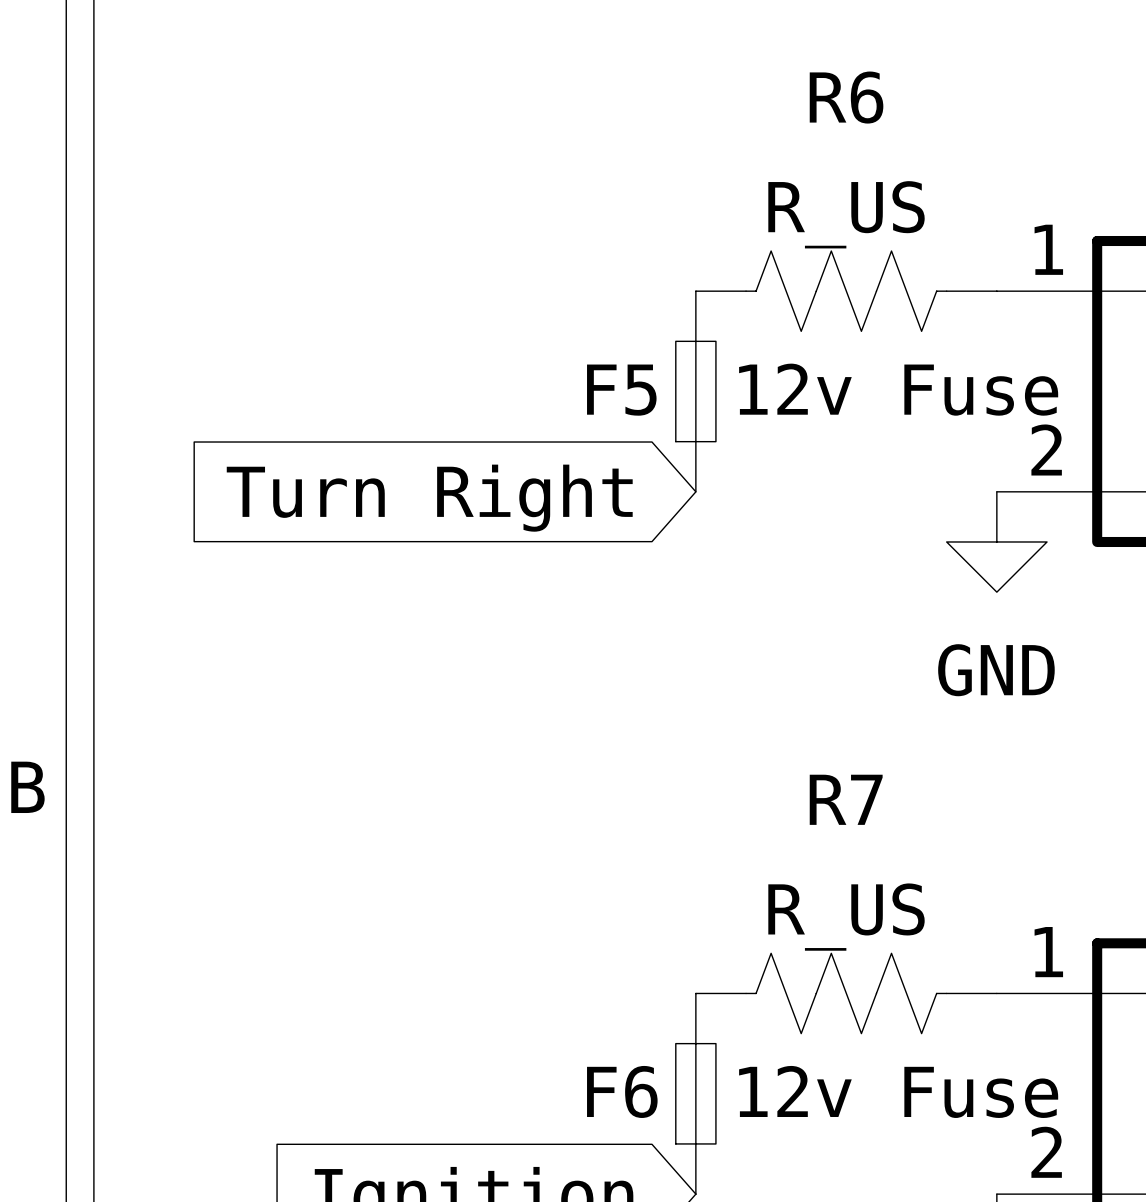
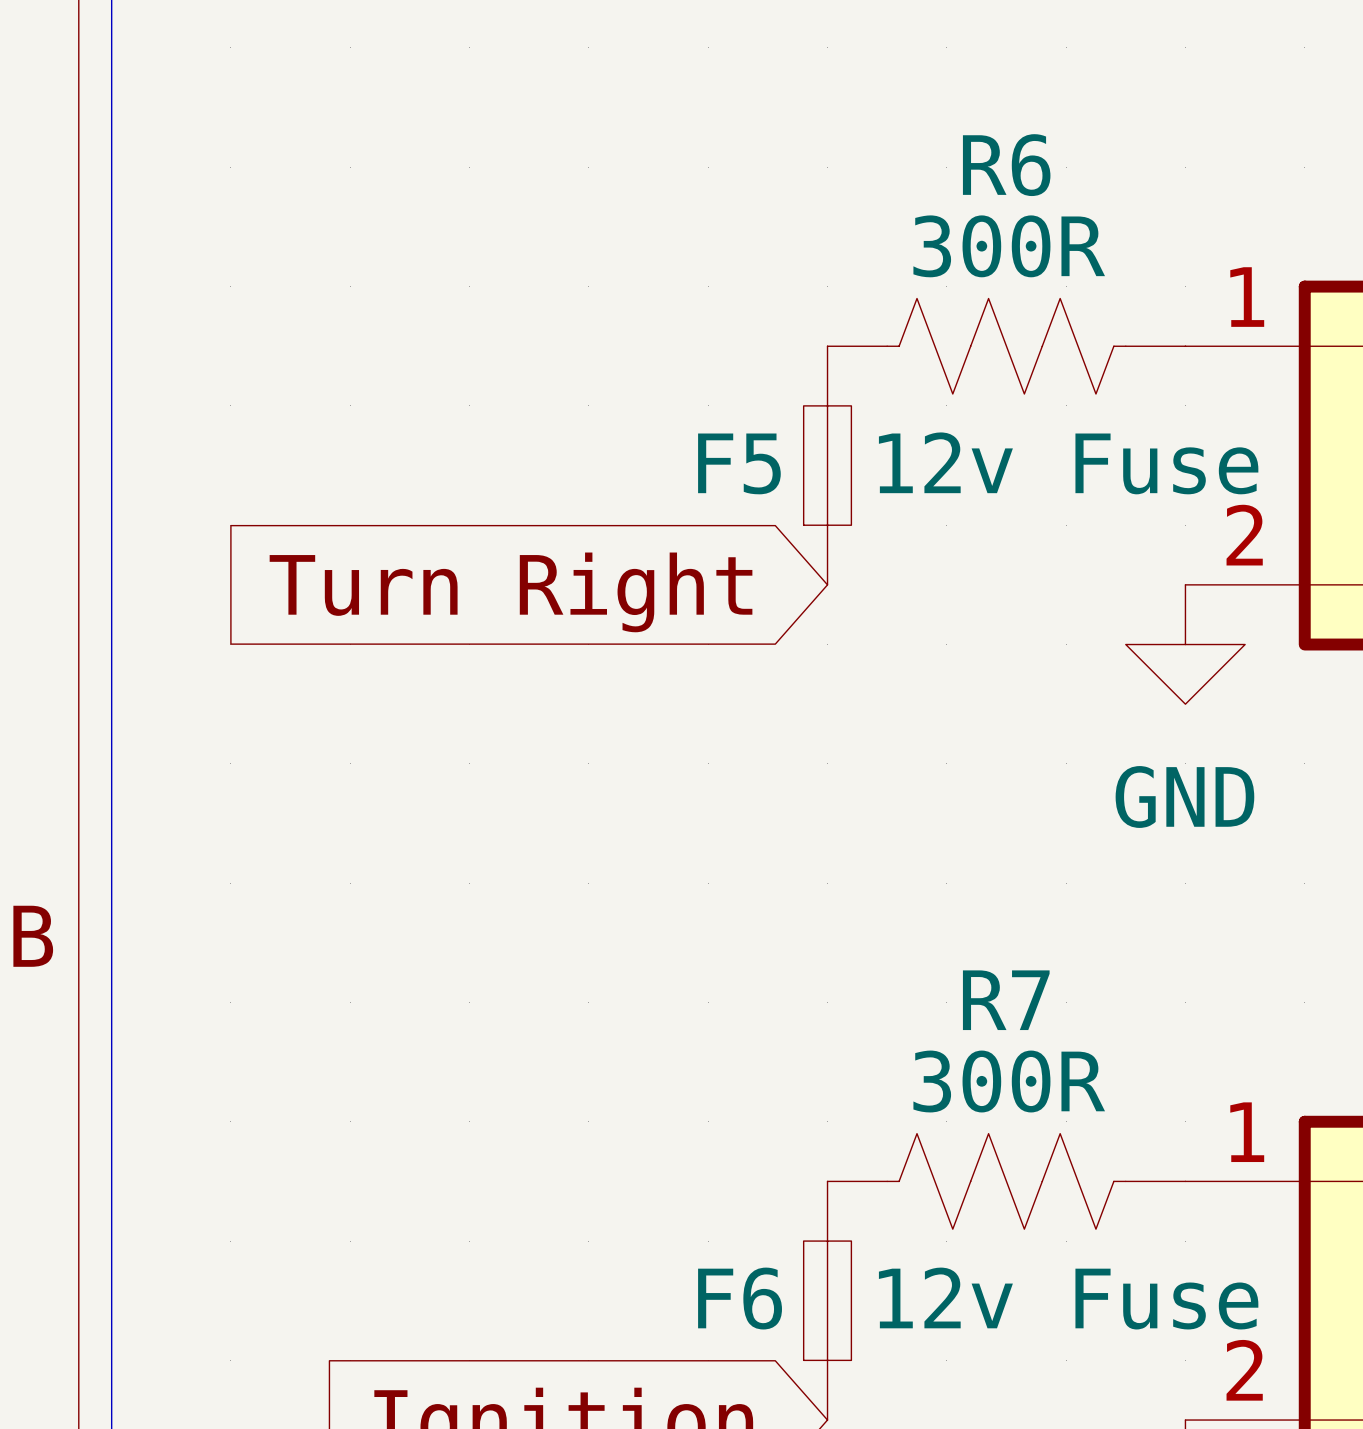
R6 name position: R6 (846, 97) -> R6 (1006, 165)
R6 value: R_US (846, 214) -> 300R (1009, 246)
R7 name position: R7 (846, 799) -> R7 (1006, 1000)
R7 value: R_US (846, 917) -> 300R (1009, 1081)

